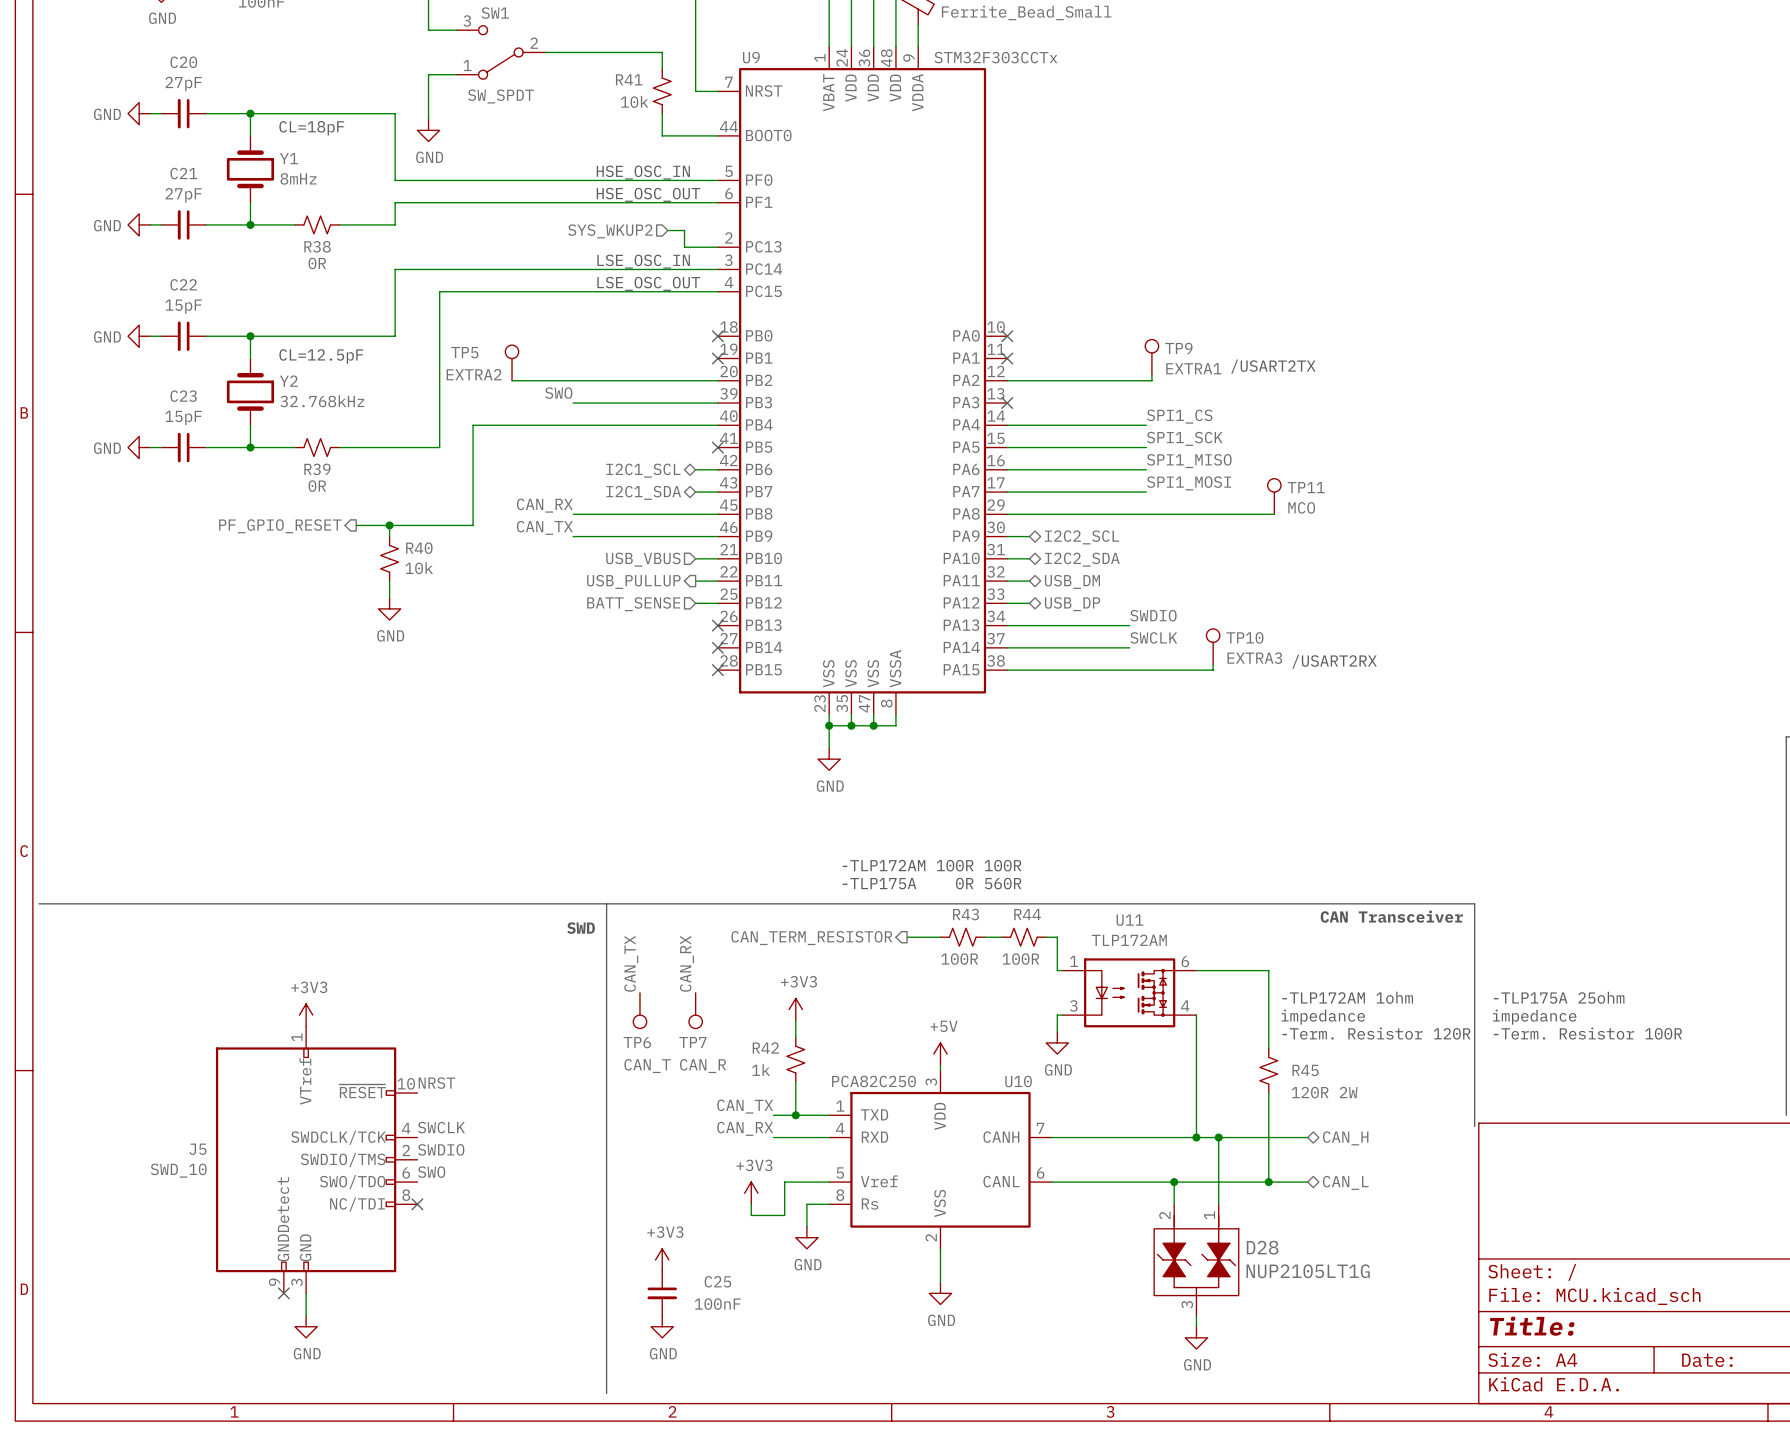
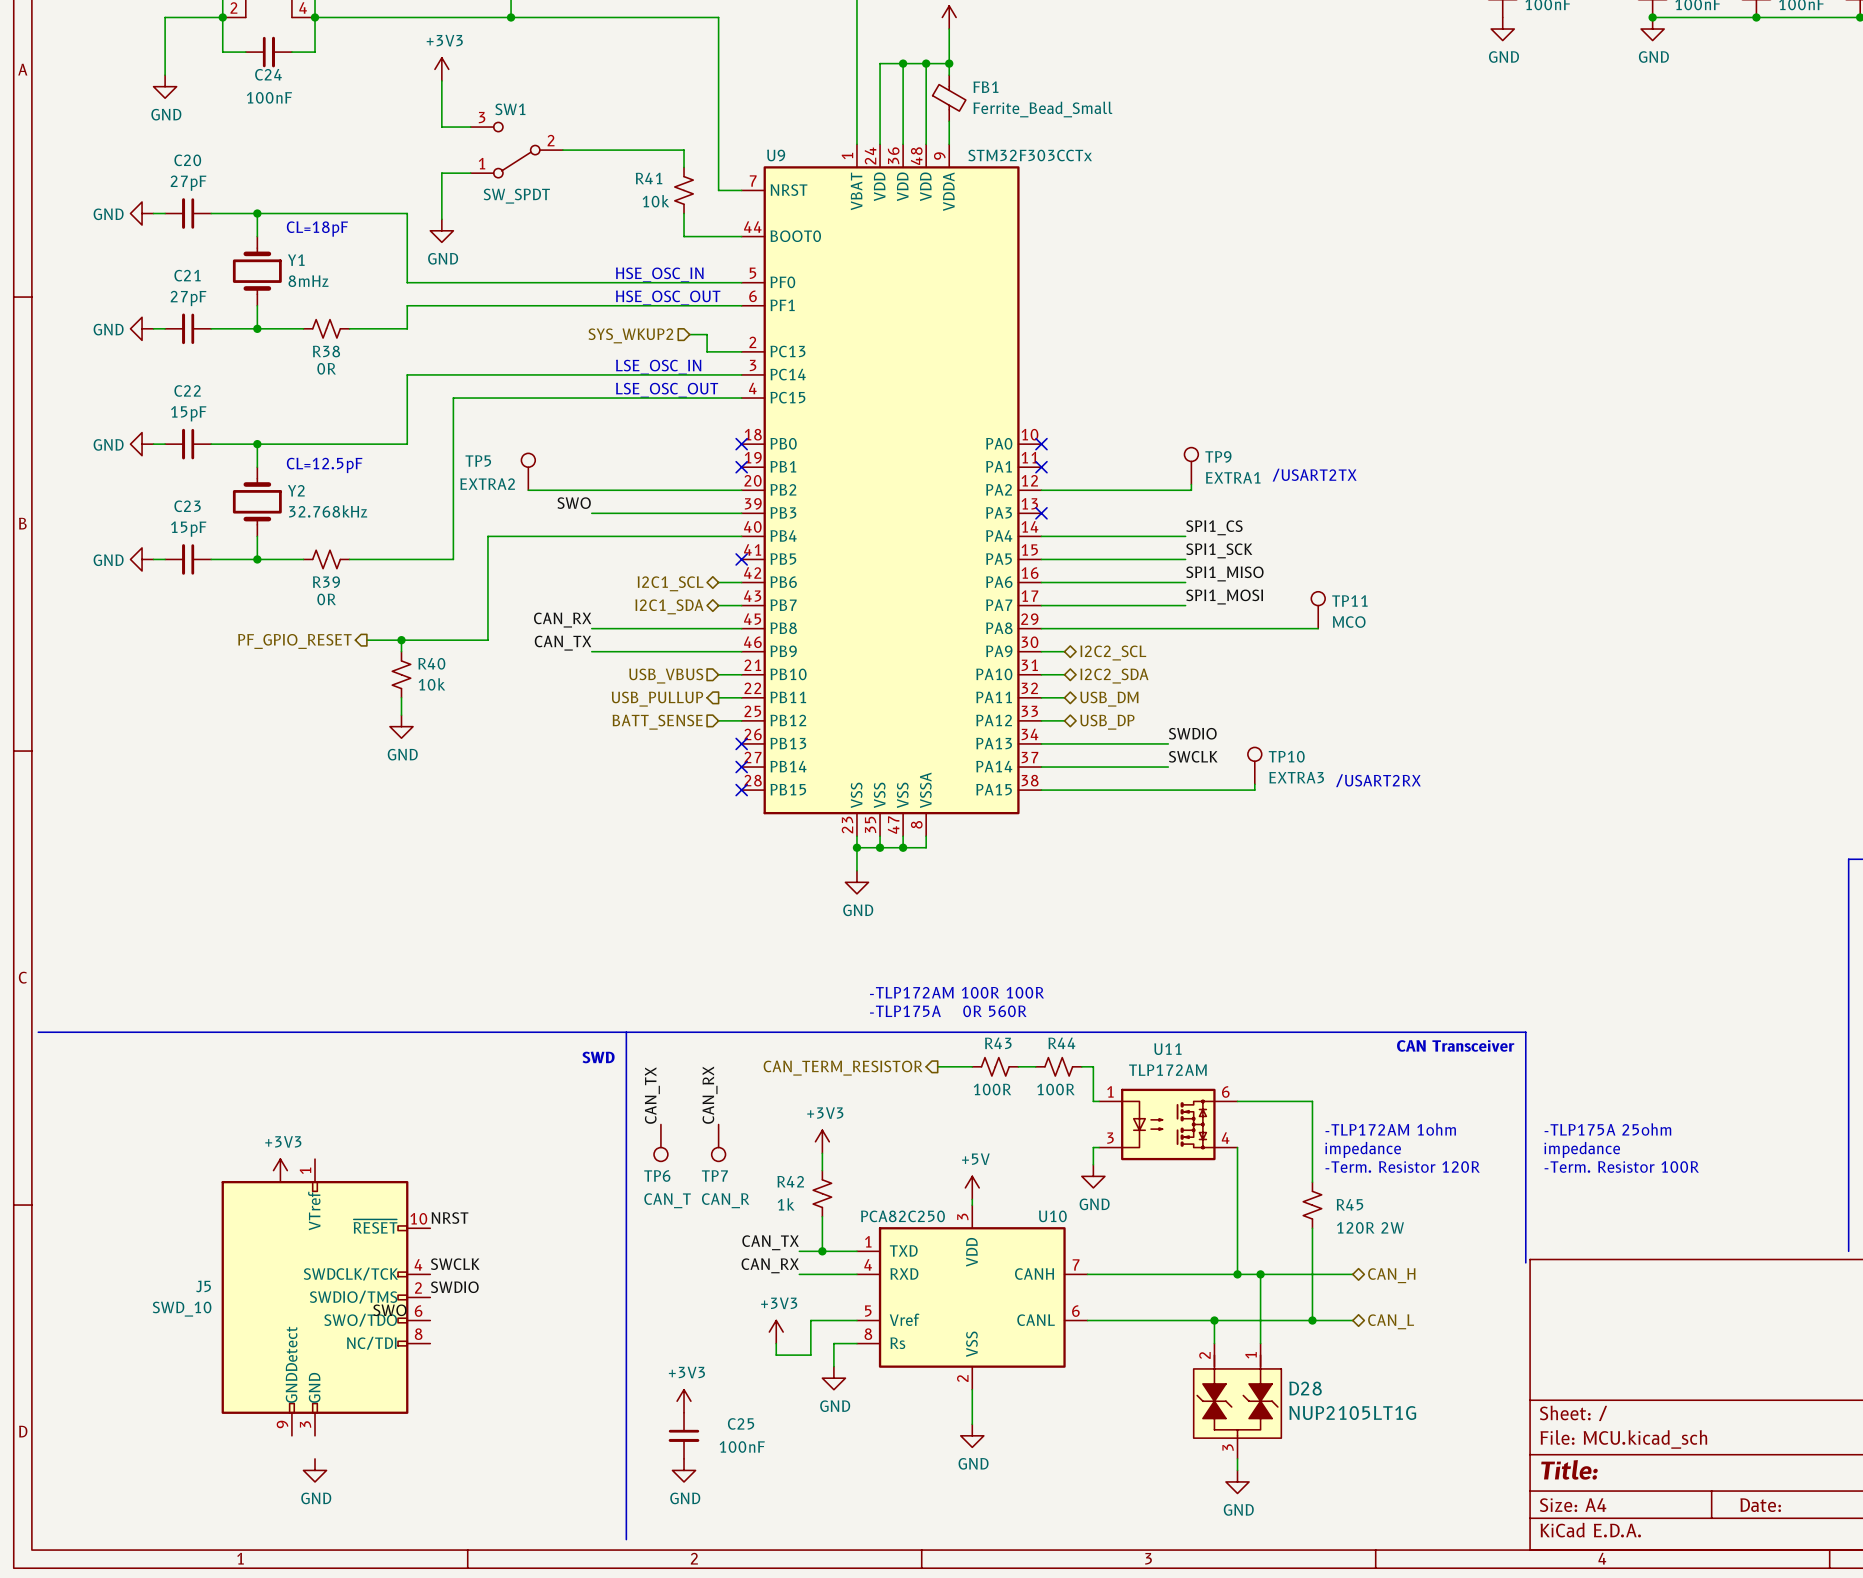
power symbol position: +3V3 (306, 1015) -> +3V3 (280, 1170)
label position: SWO (431, 1172) -> SWO (389, 1310)
no-connect mark: (417, 1204) -> none
no-connect mark: (283, 1293) -> none
wire: (306, 1293) (306, 1315) -> none

